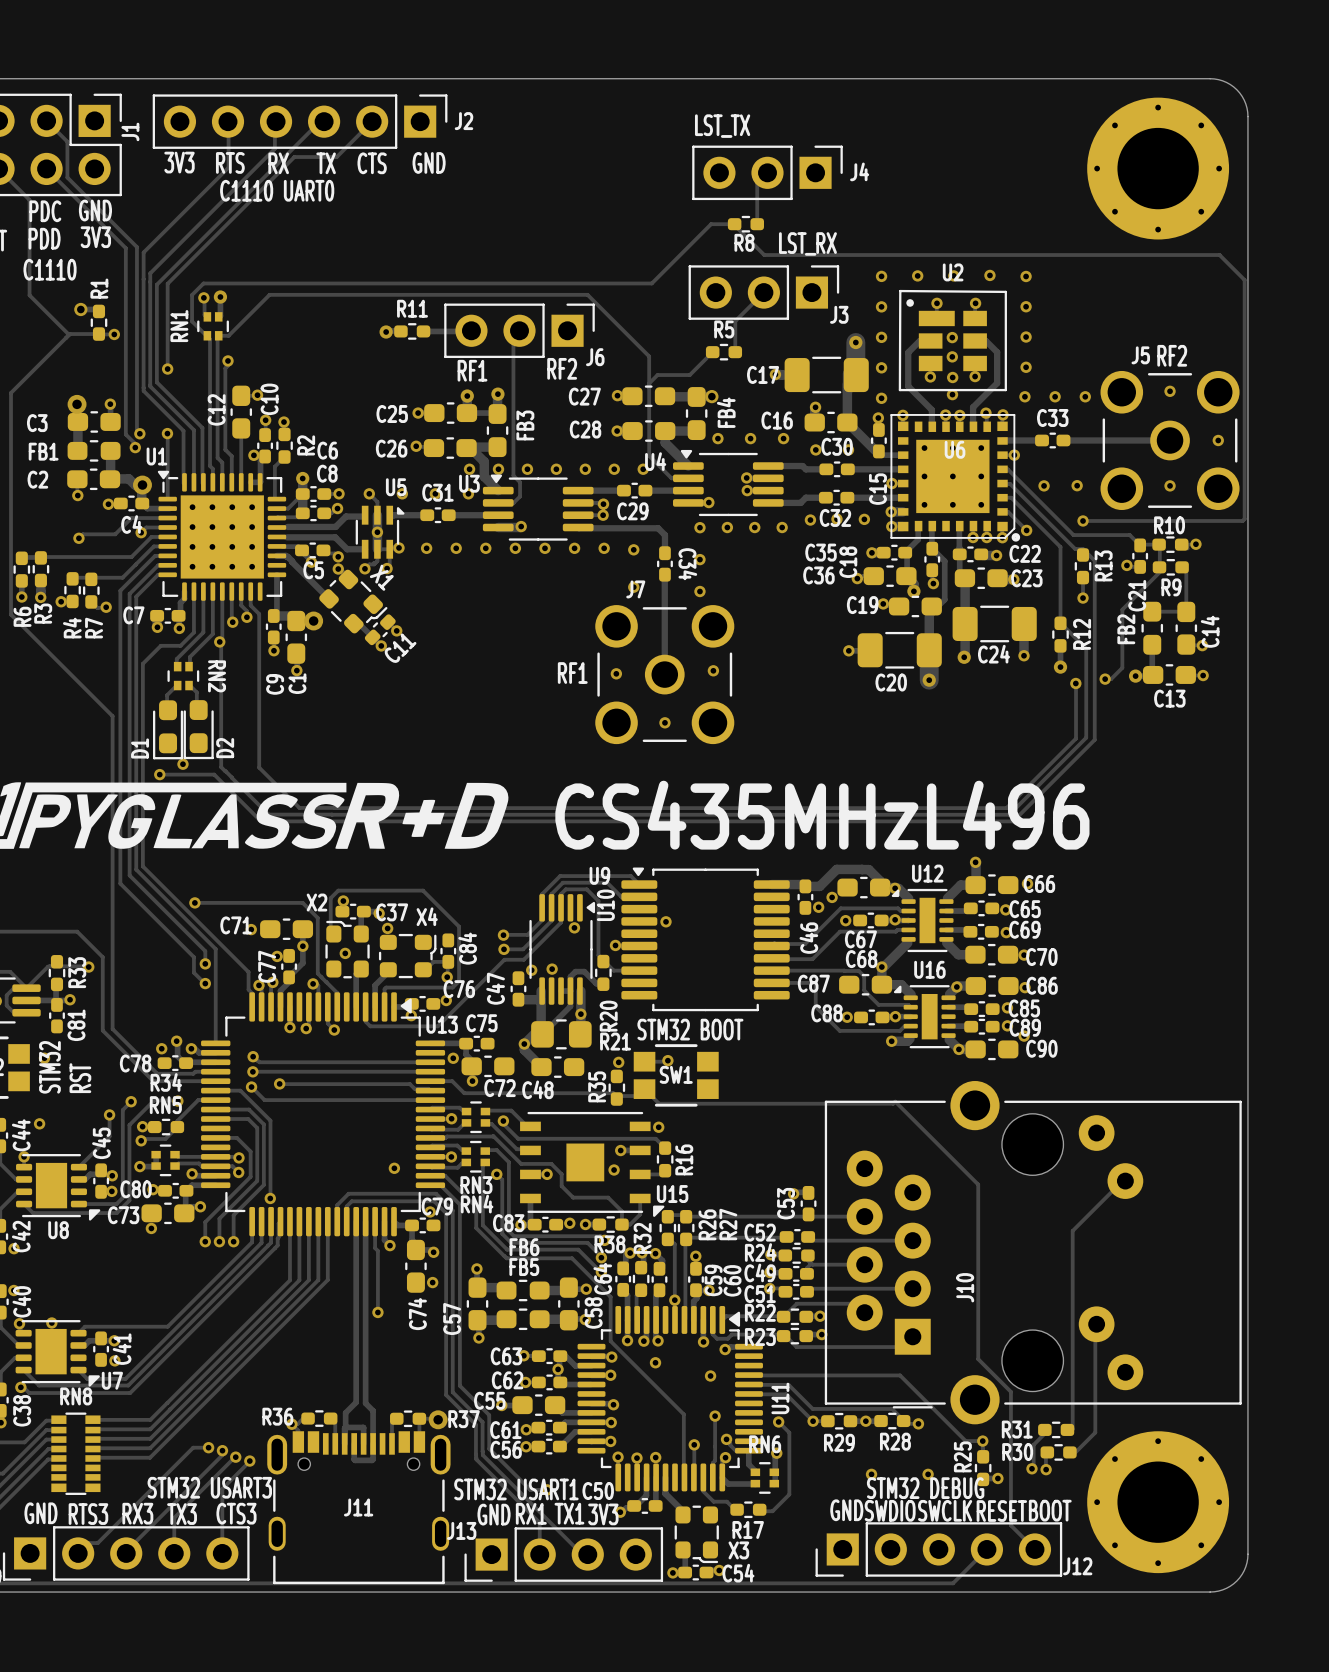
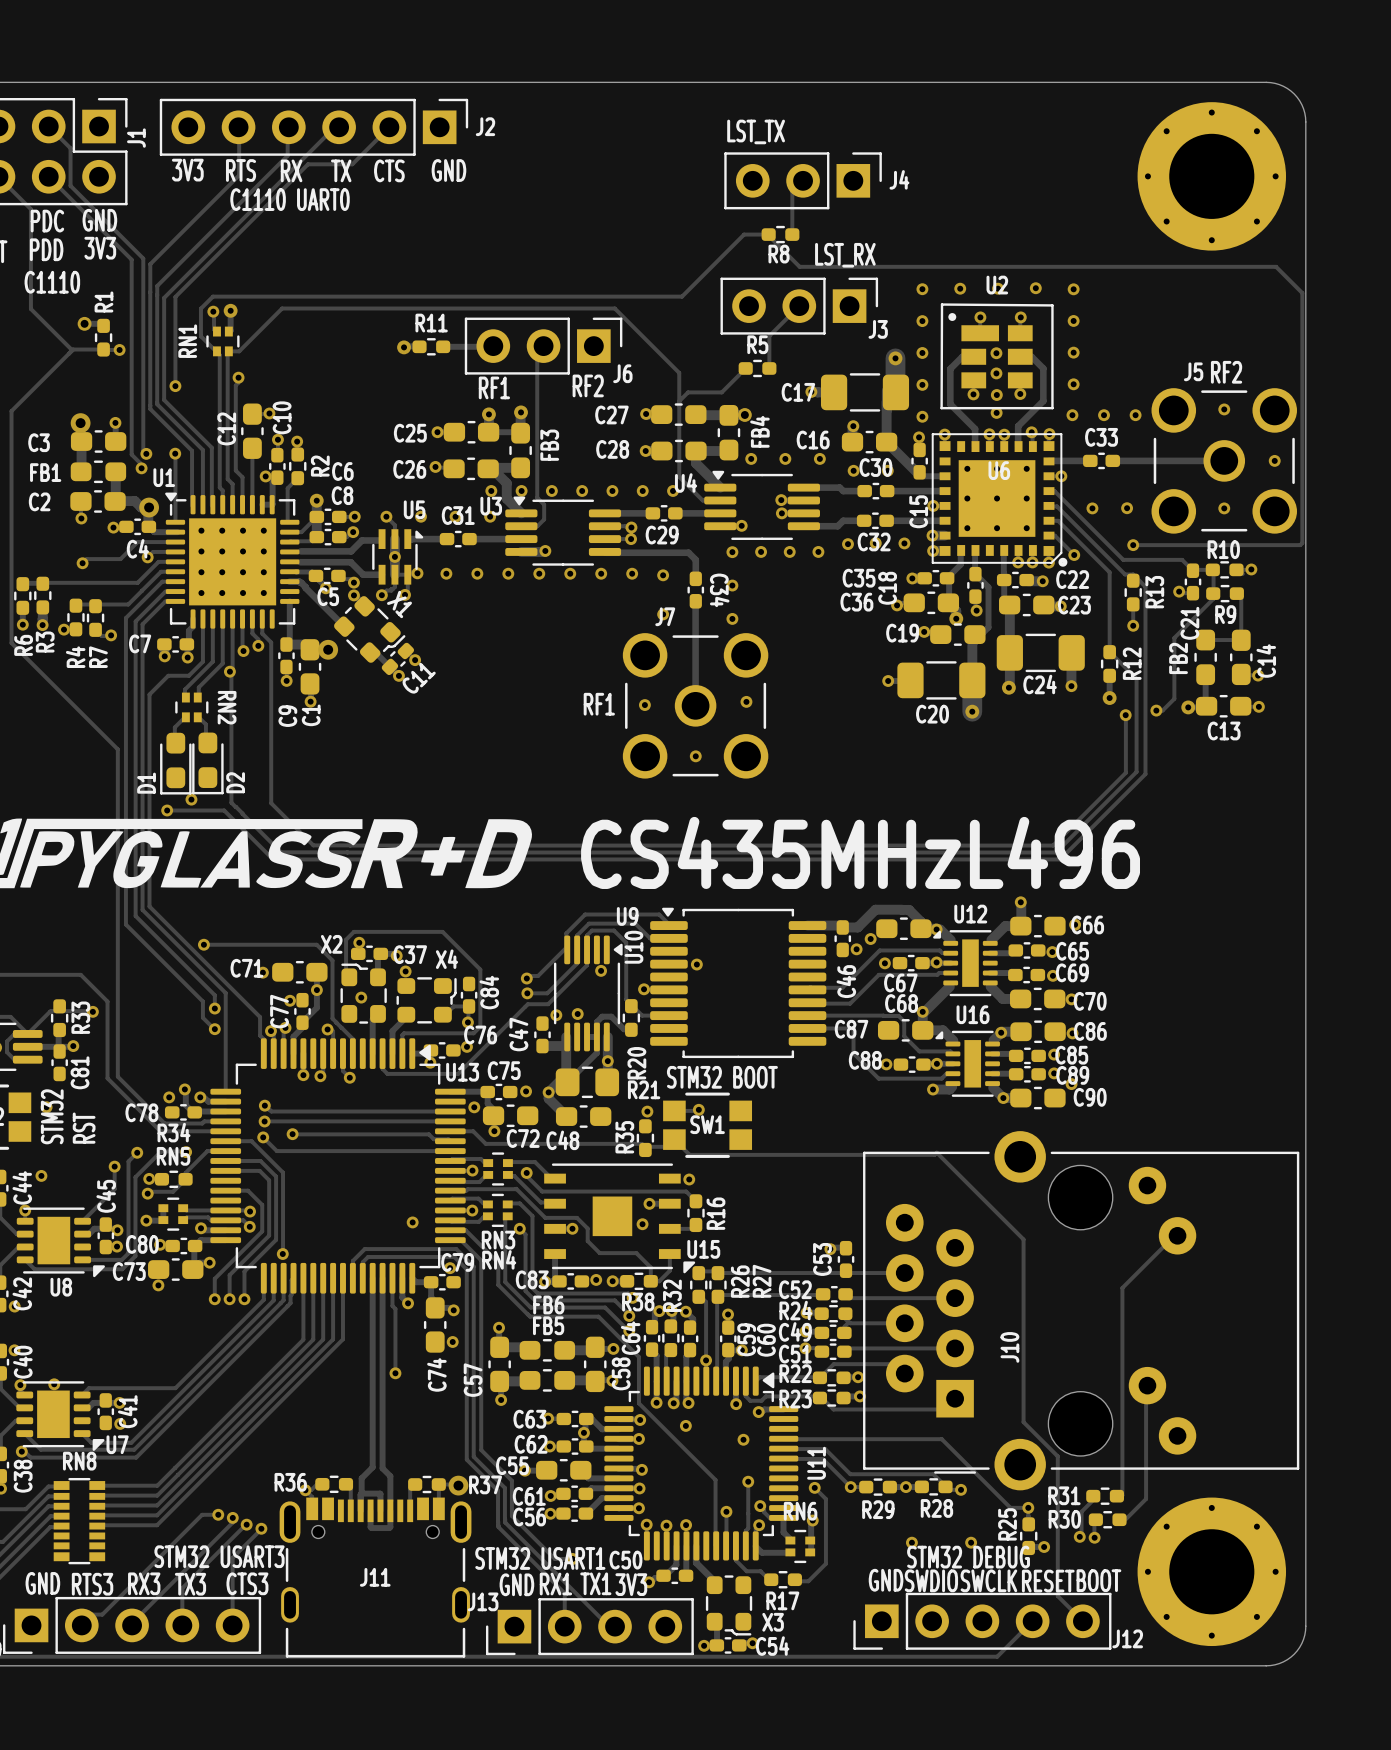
track: none -> (668, 923) (659, 914) (585, 914) (566, 933) (566, 947) (538, 976) (528, 976)
track: (639, 884) (630, 876) (560, 876) (542, 894) (542, 920) (527, 934) (503, 935) -> none
via: none -> (526, 1091)

